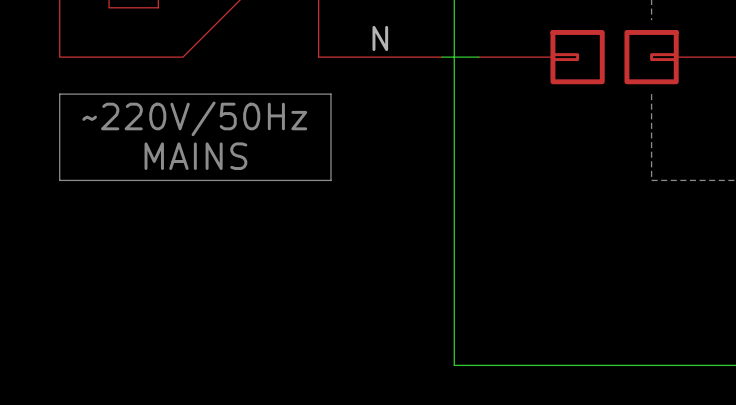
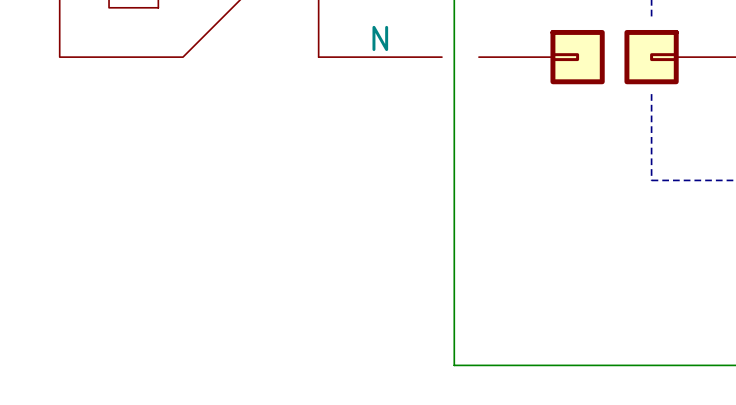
wire: (441, 57) (478, 57) -> none
line: (59, 94) (330, 94) (330, 180) (59, 180) (59, 94) -> none
text: ~220V/50Hz (194, 118) -> none
text: MAINS (195, 156) -> none

